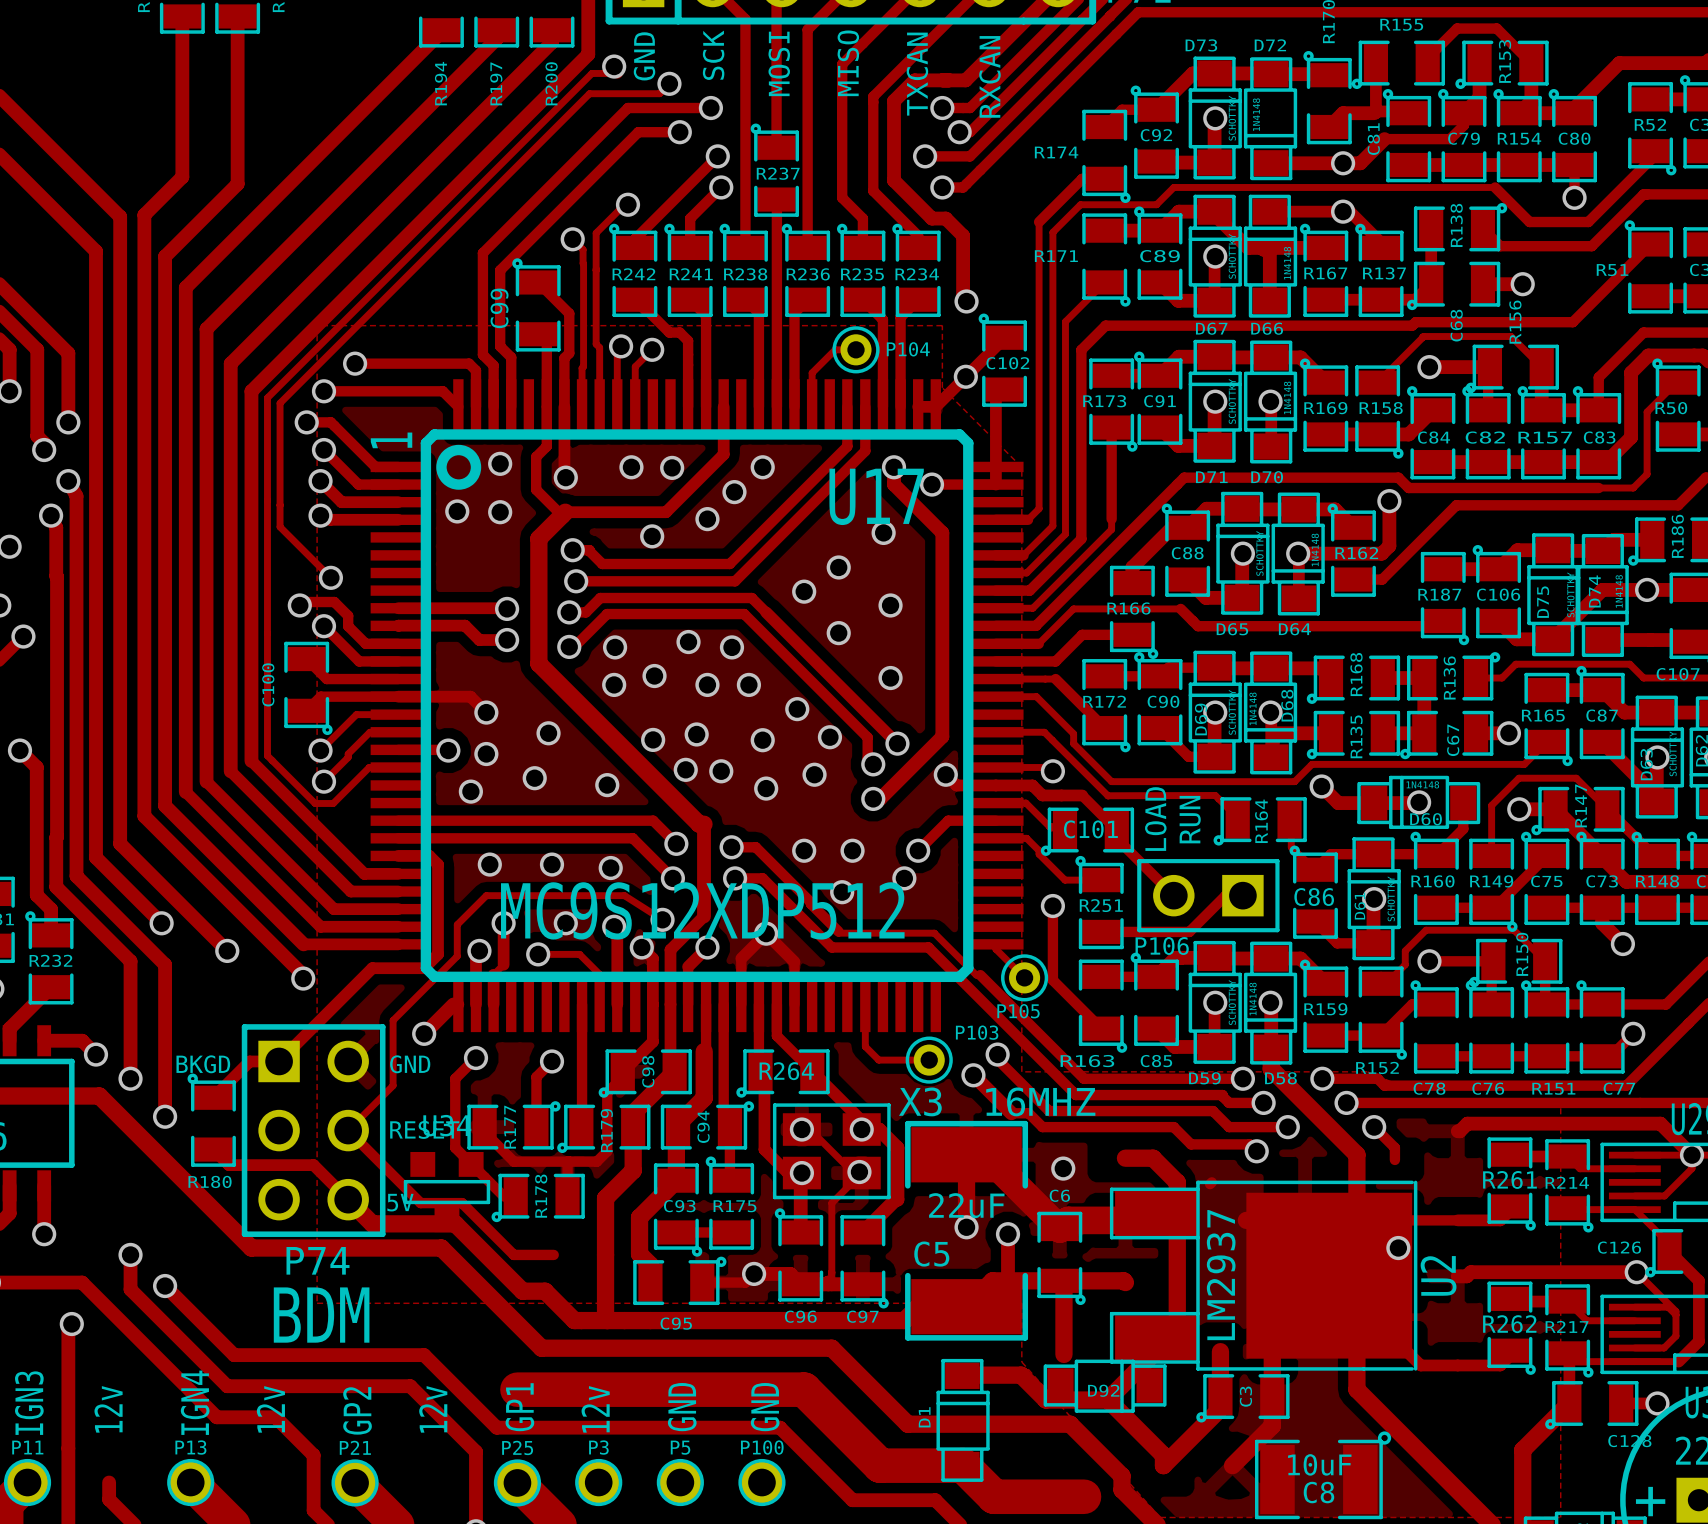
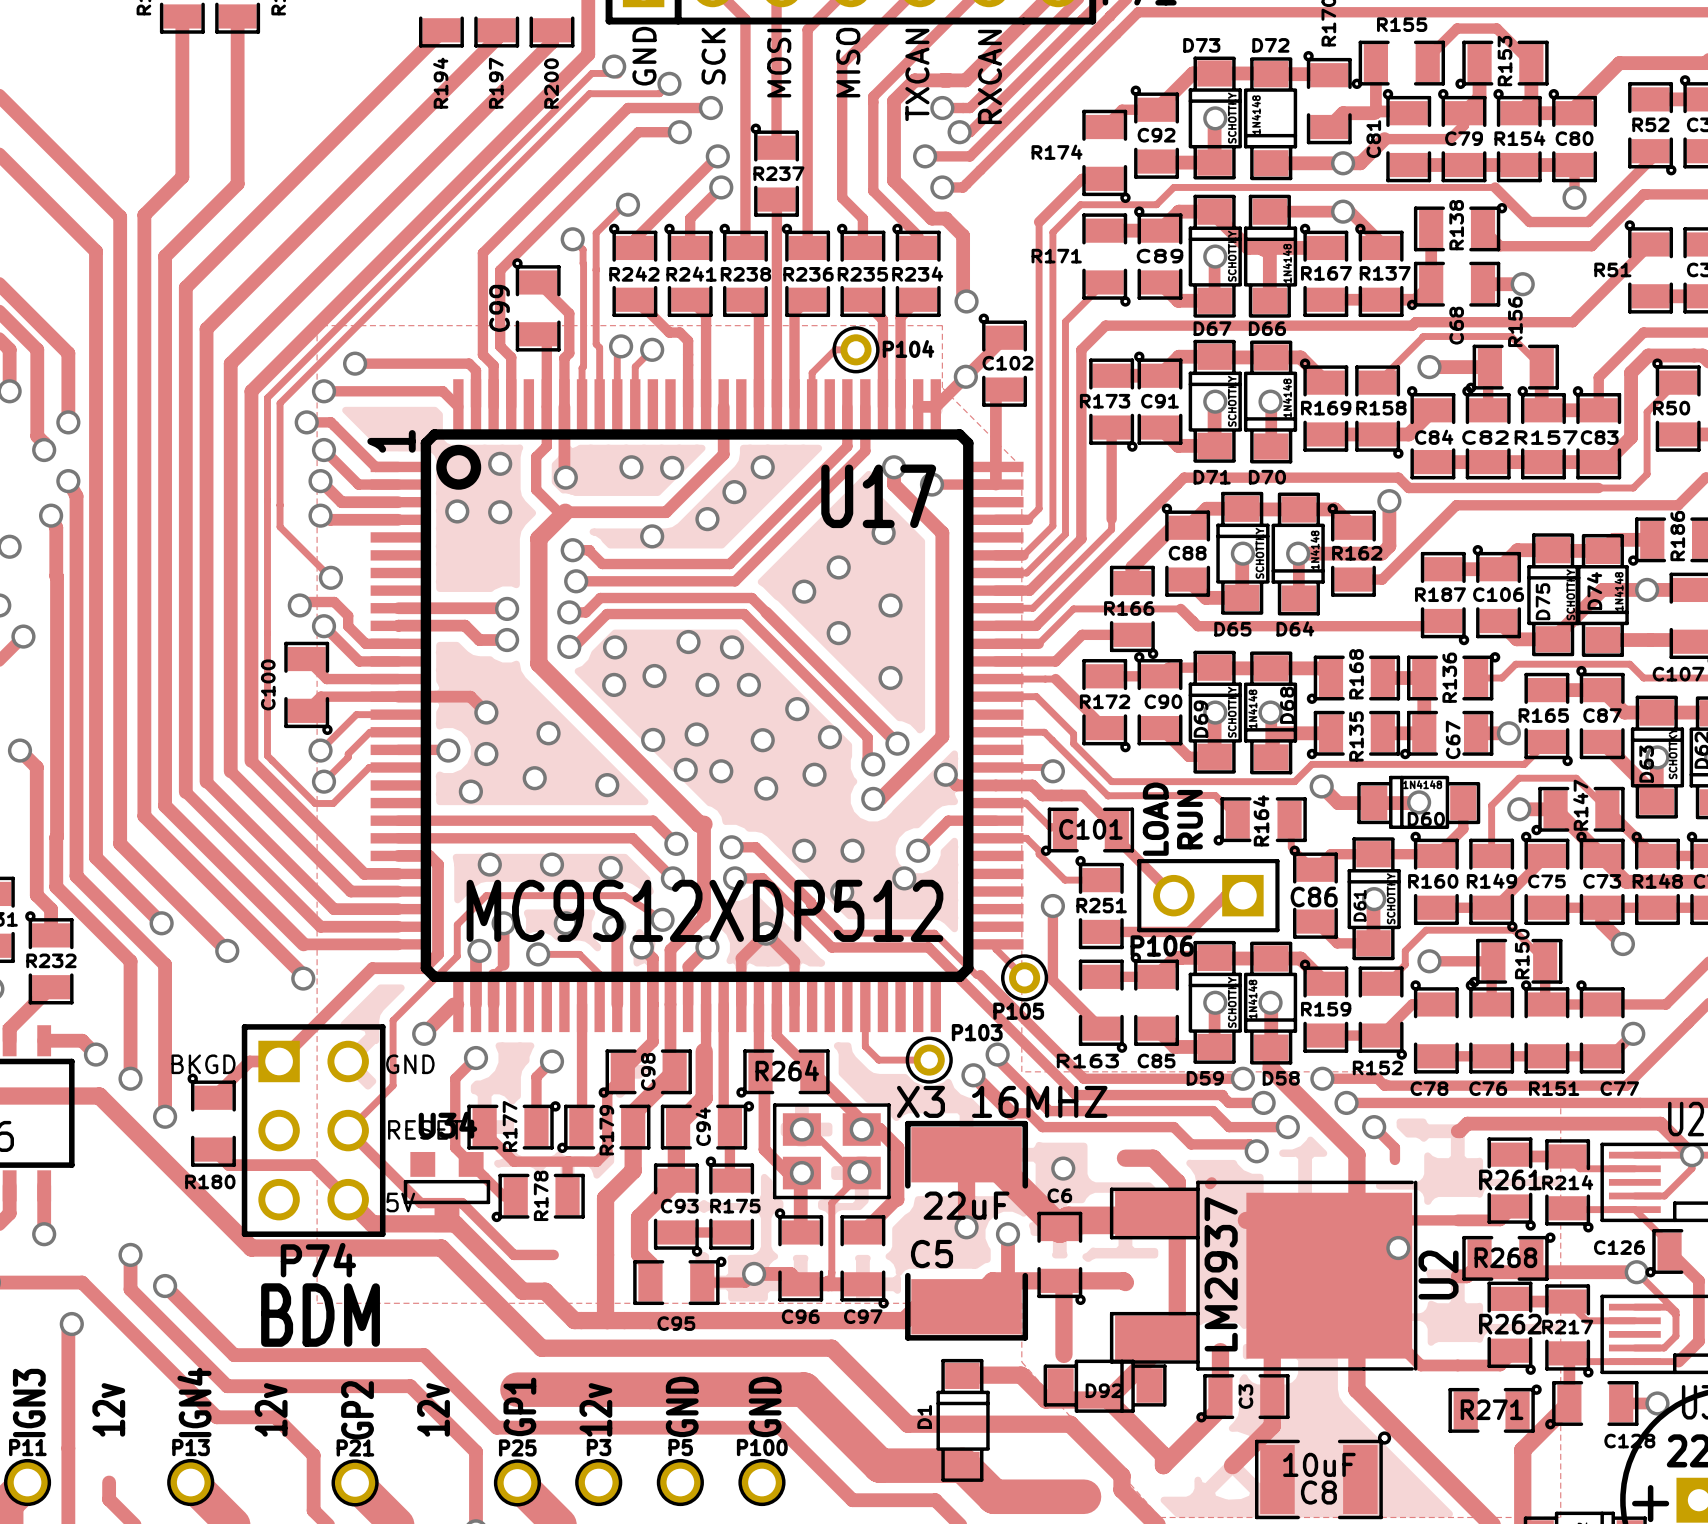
R268: none -> (1508, 1256)
R271: none -> (1495, 1408)

